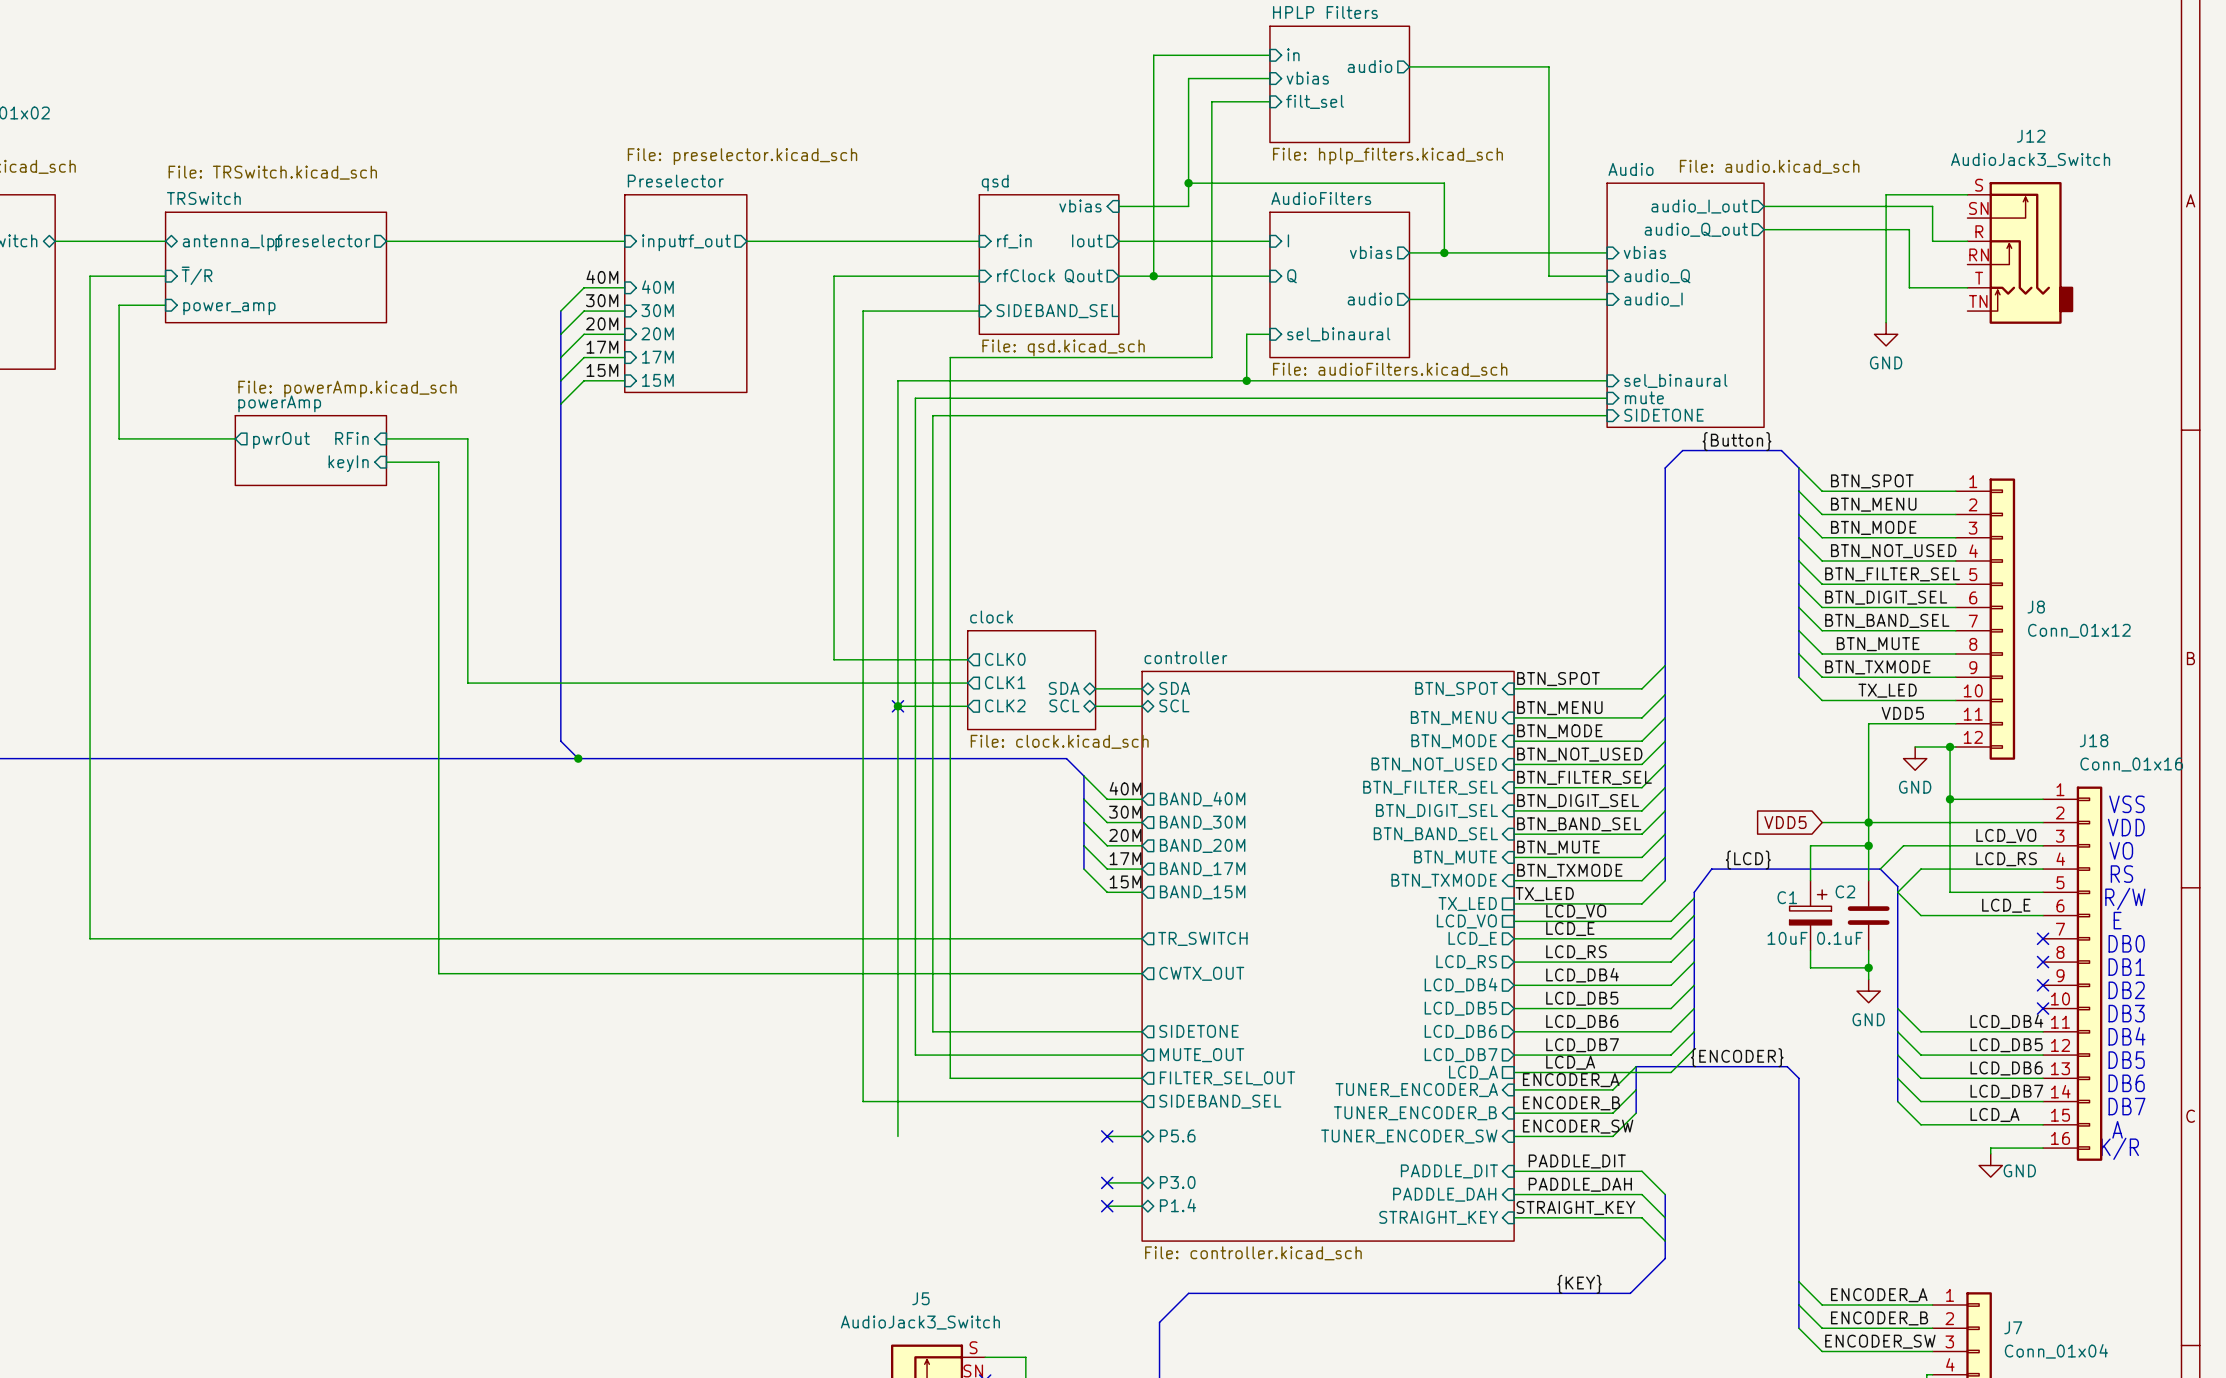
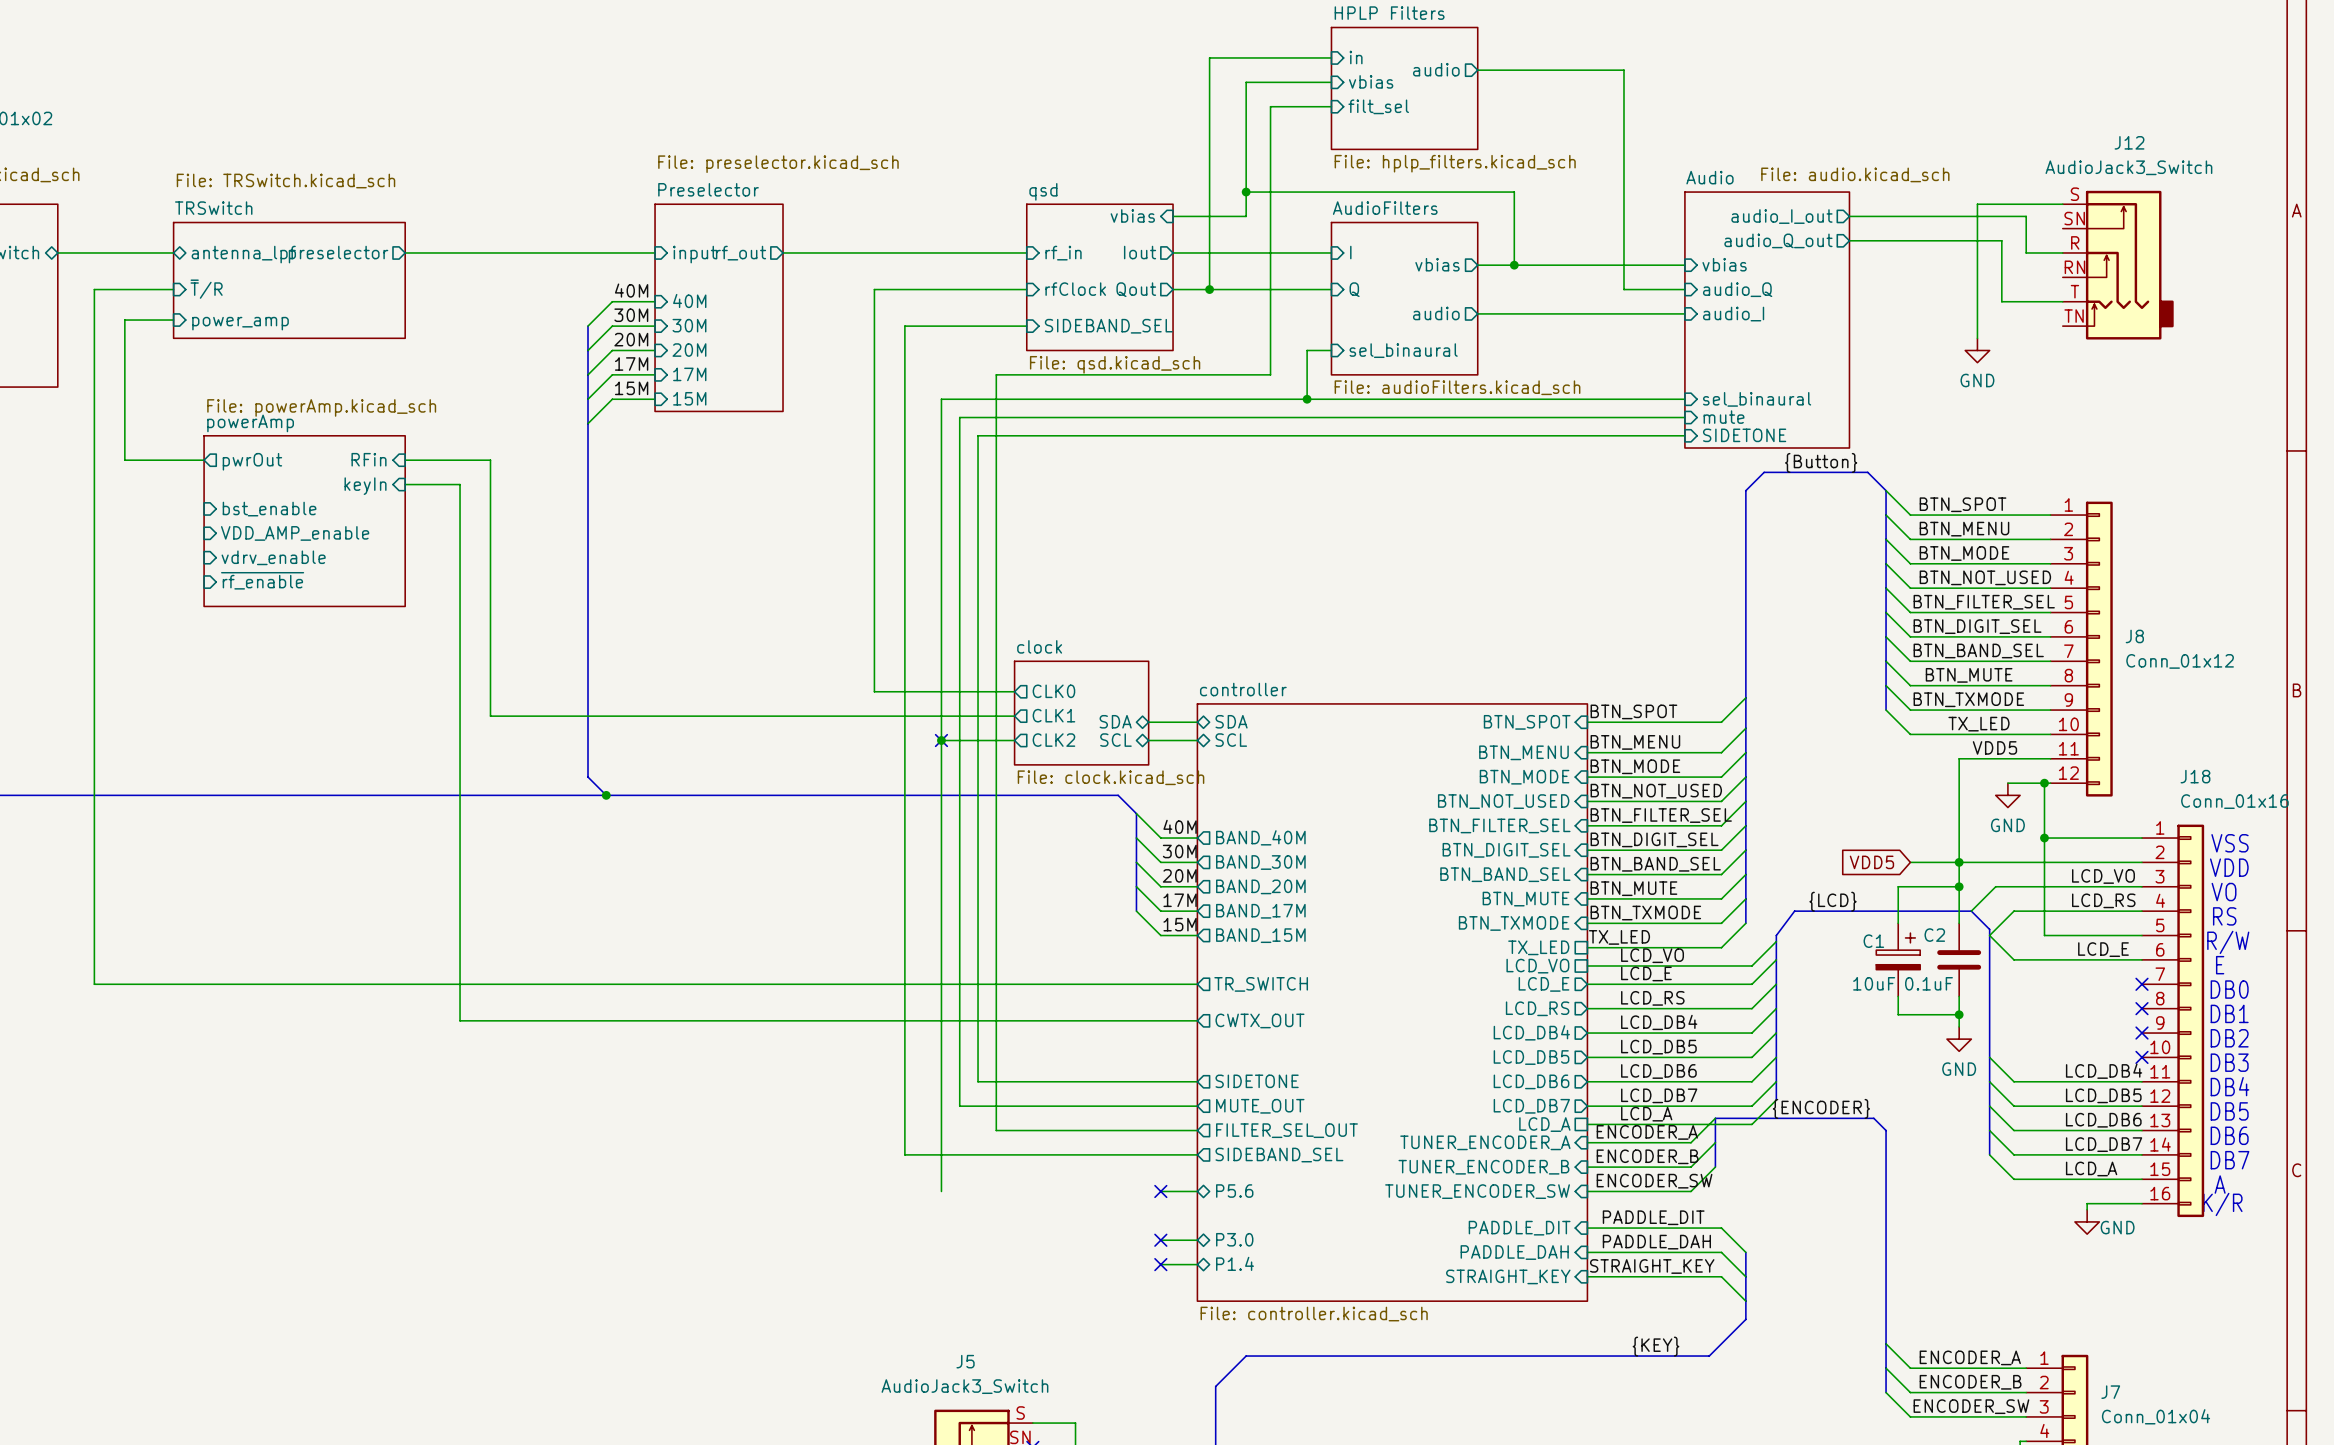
wire: (194, 438) (235, 438) -> none
sheet pin position: pwrOut (281, 440) -> pwrOut (252, 461)
sheet powerAmp: File: powerAmp.kicad_sch (310, 450) -> none
sheet pin: none -> bst_enable (269, 509)
sheet powerAmp: none -> File: powerAmp.kicad_sch (304, 521)
sheet pin: none -> VDD_AMP_enable (295, 533)
sheet pin: none -> vdrv_enable (273, 557)
sheet pin: none -> ~{rf_enable} (262, 580)

